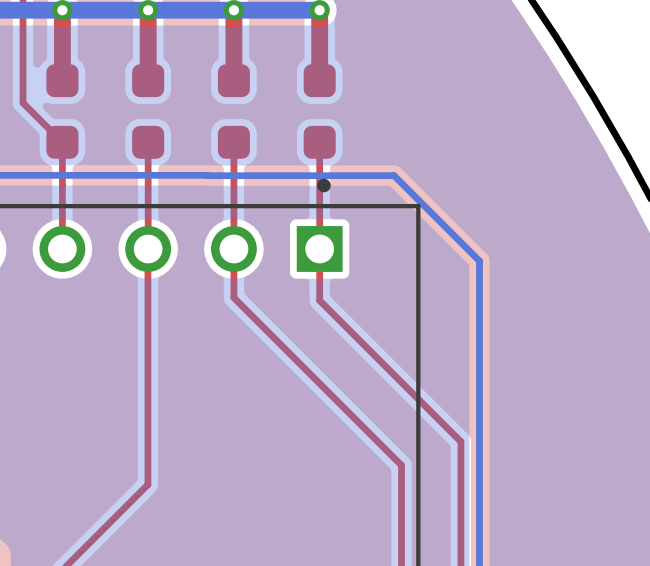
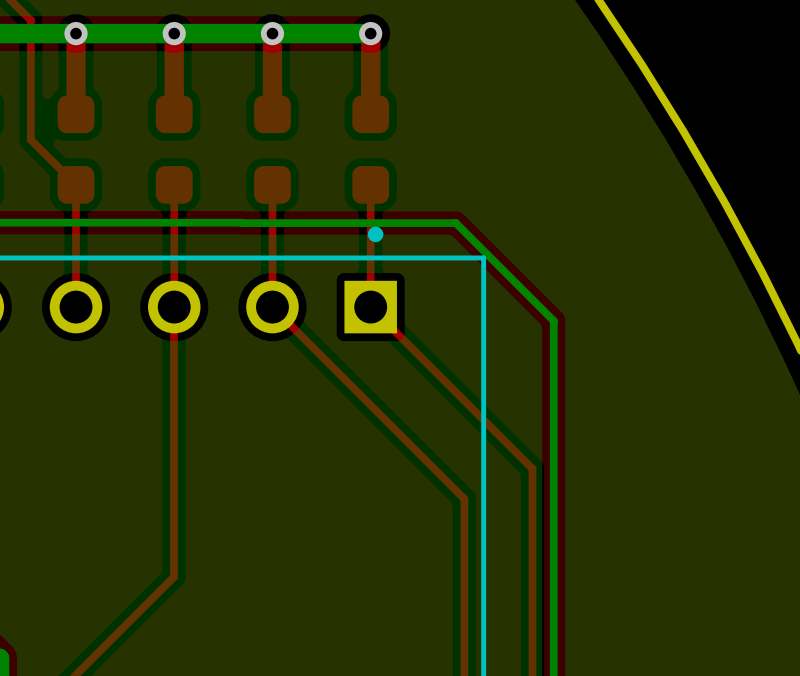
top track: (233, 248) (233, 297) (401, 465) -> (272, 307) (464, 499) (464, 554)
top track: (319, 248) (319, 300) (460, 441) -> (370, 307) (532, 468) (532, 527)

